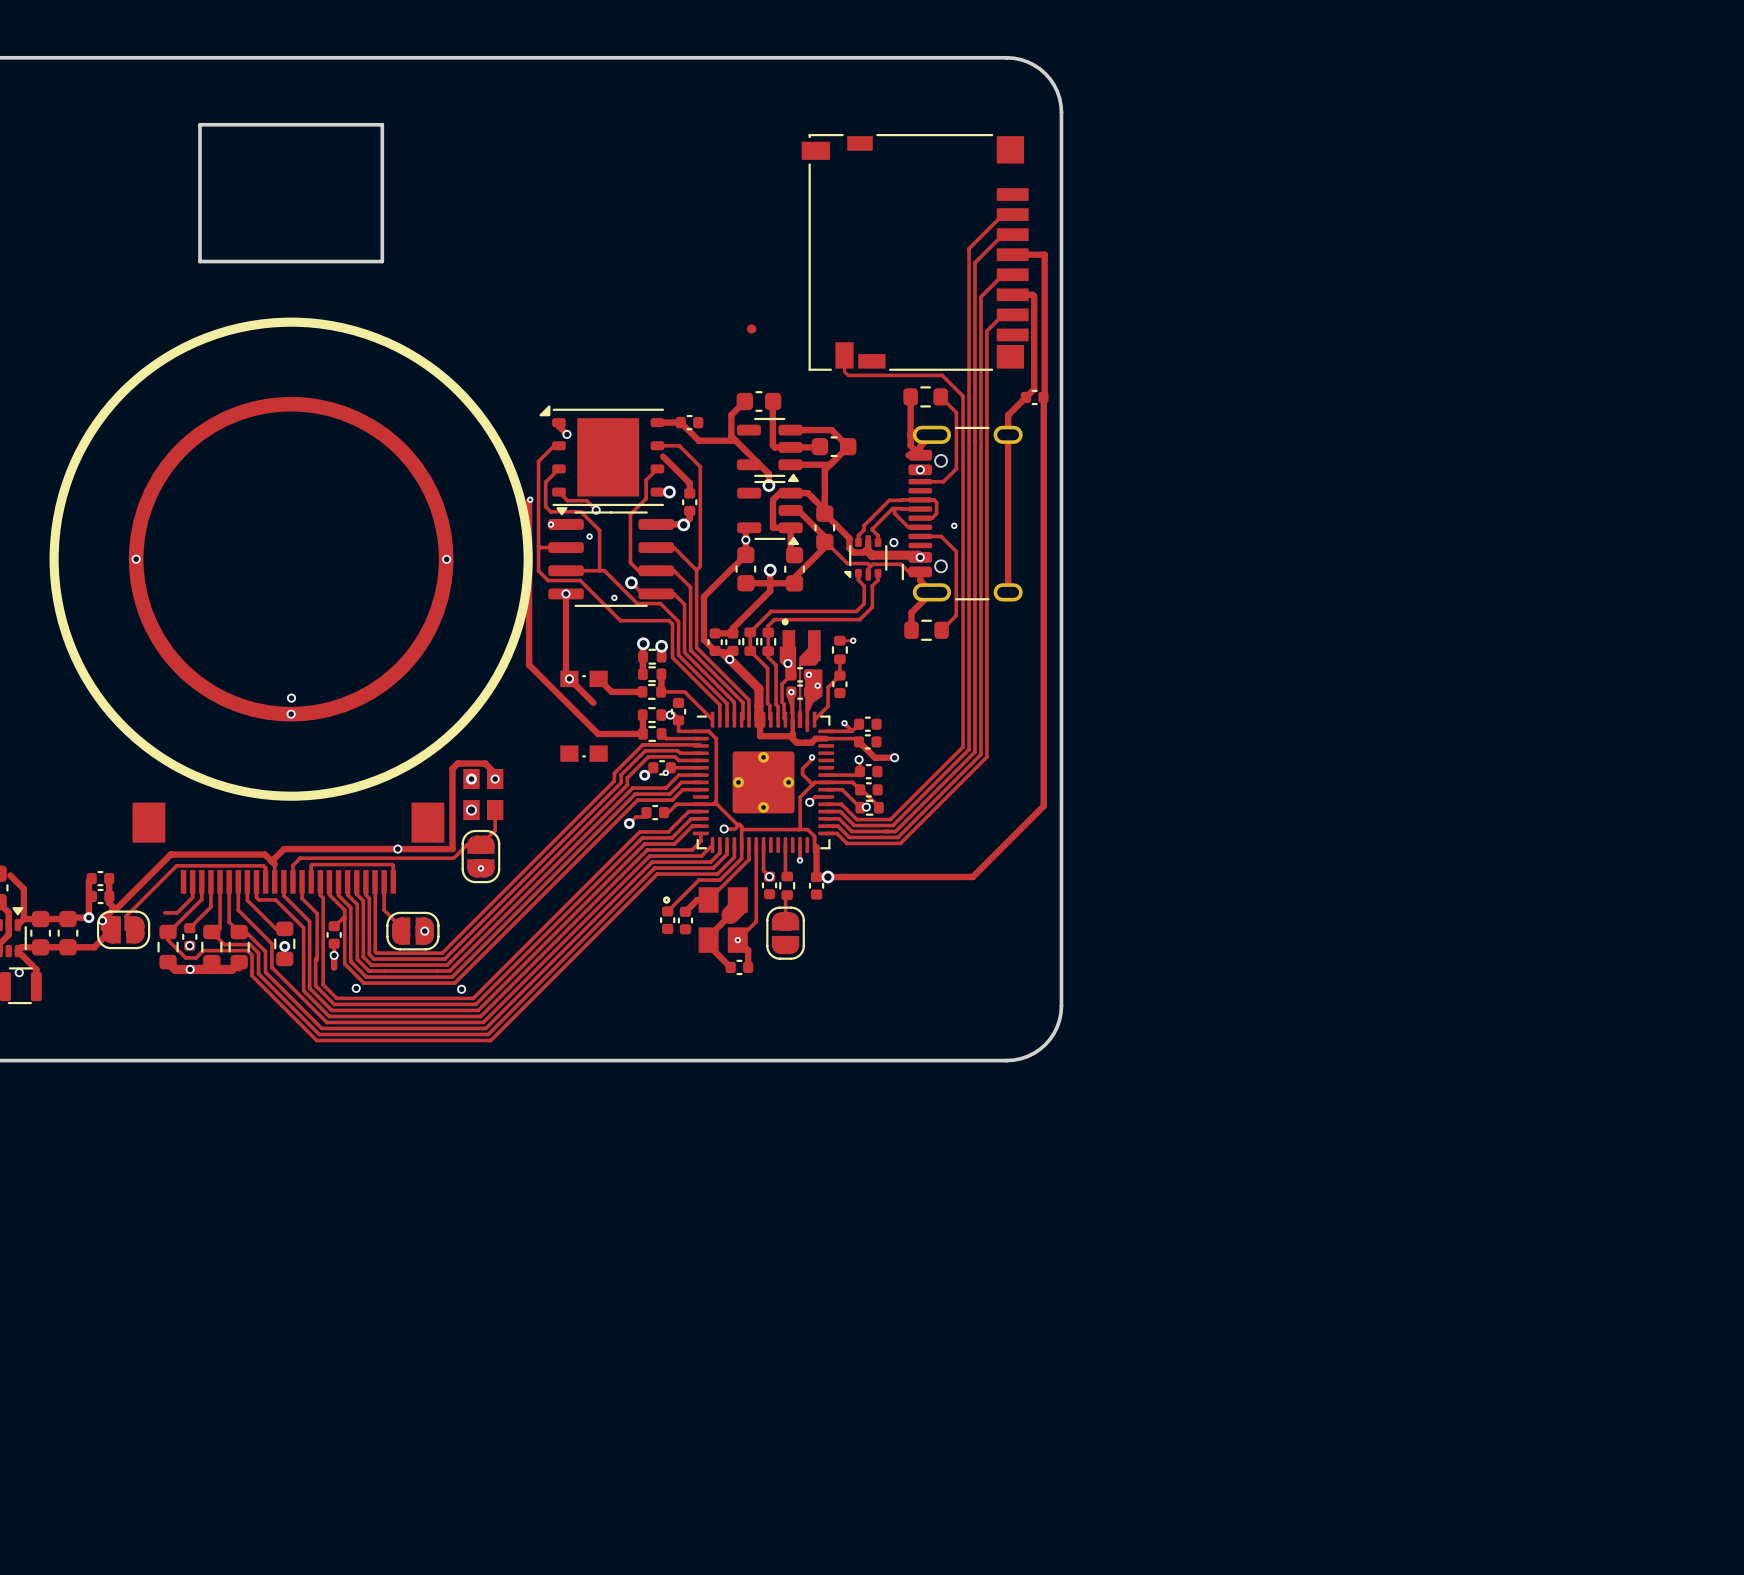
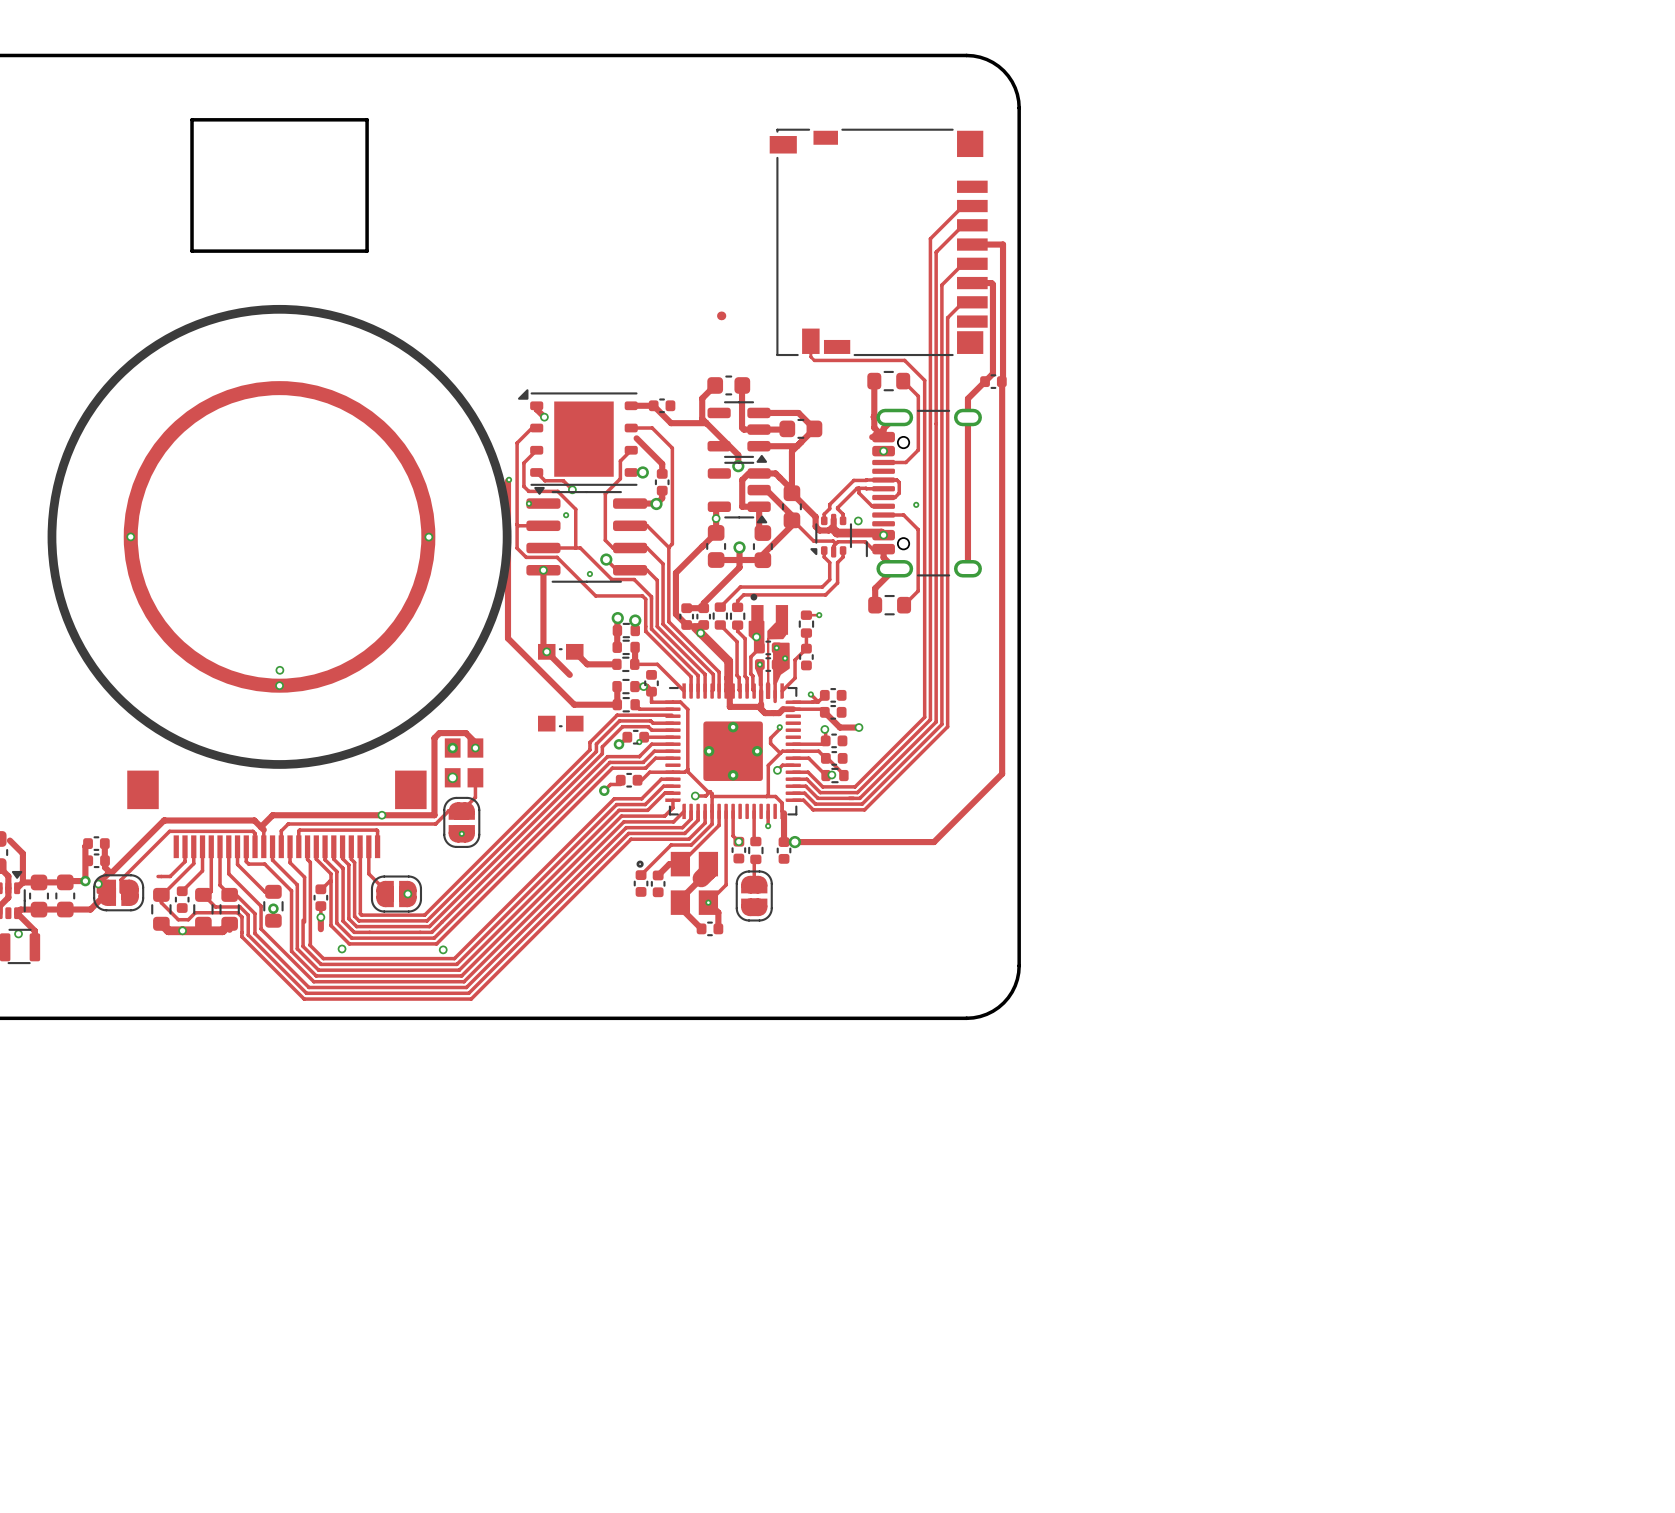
track: (750, 632) (750, 650) -> none
track: (768, 632) (768, 651) -> none
via: (189, 945) -> none

